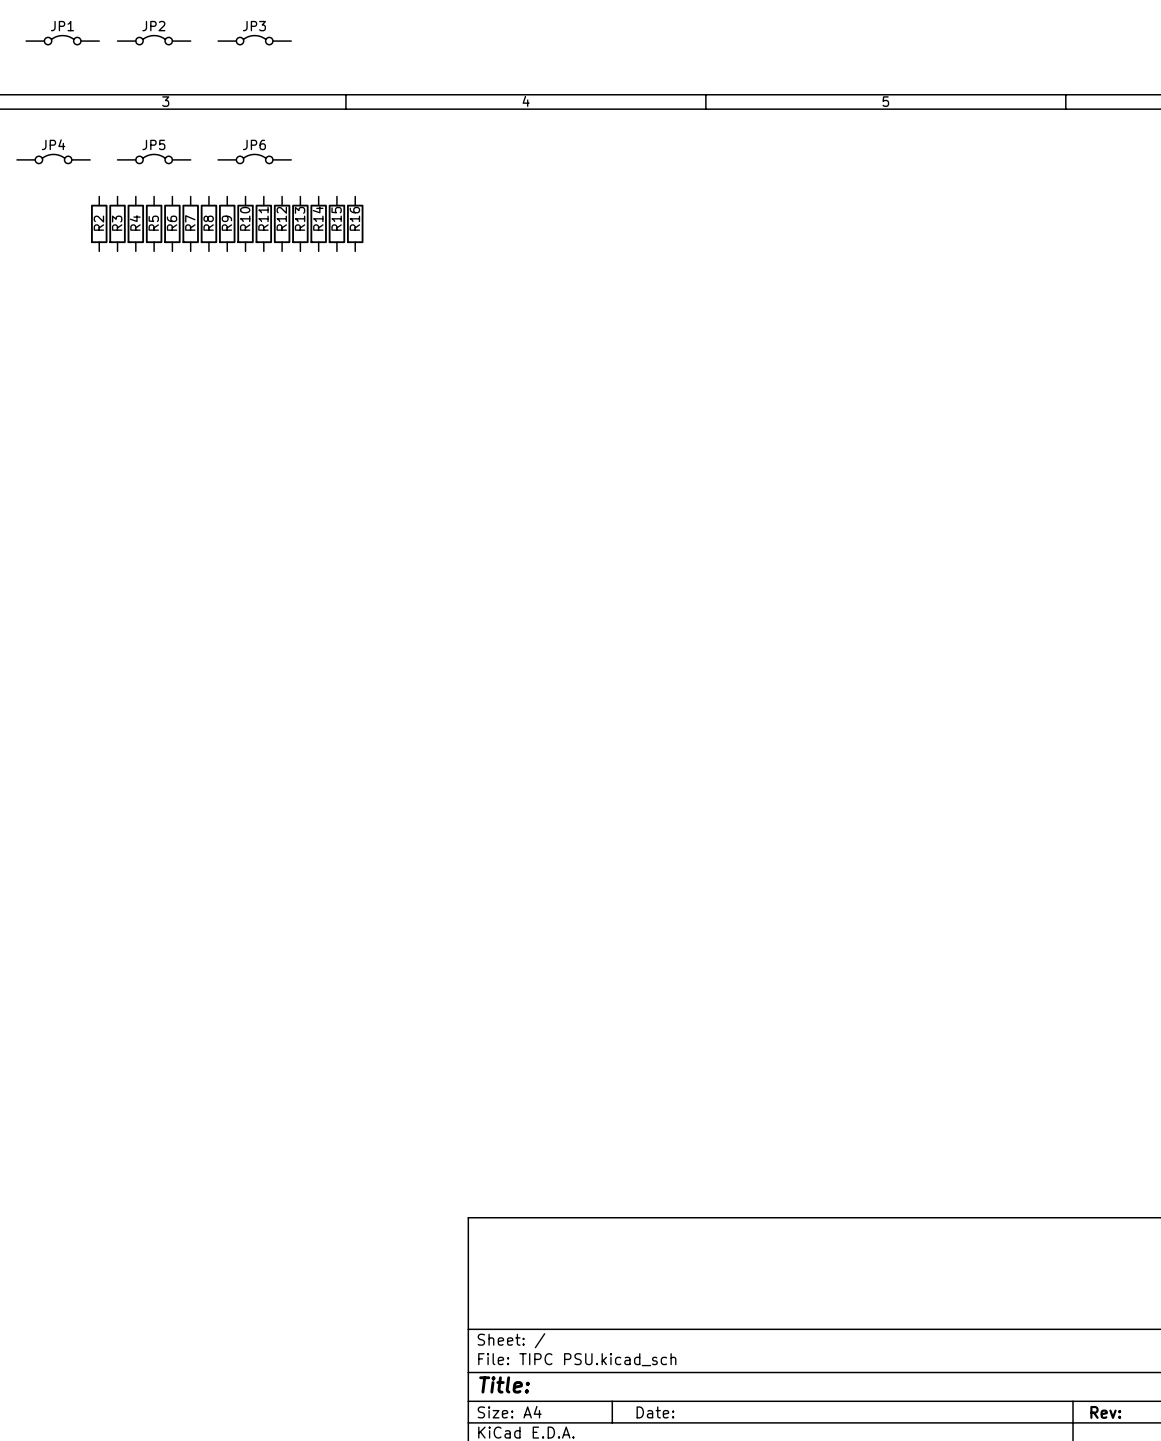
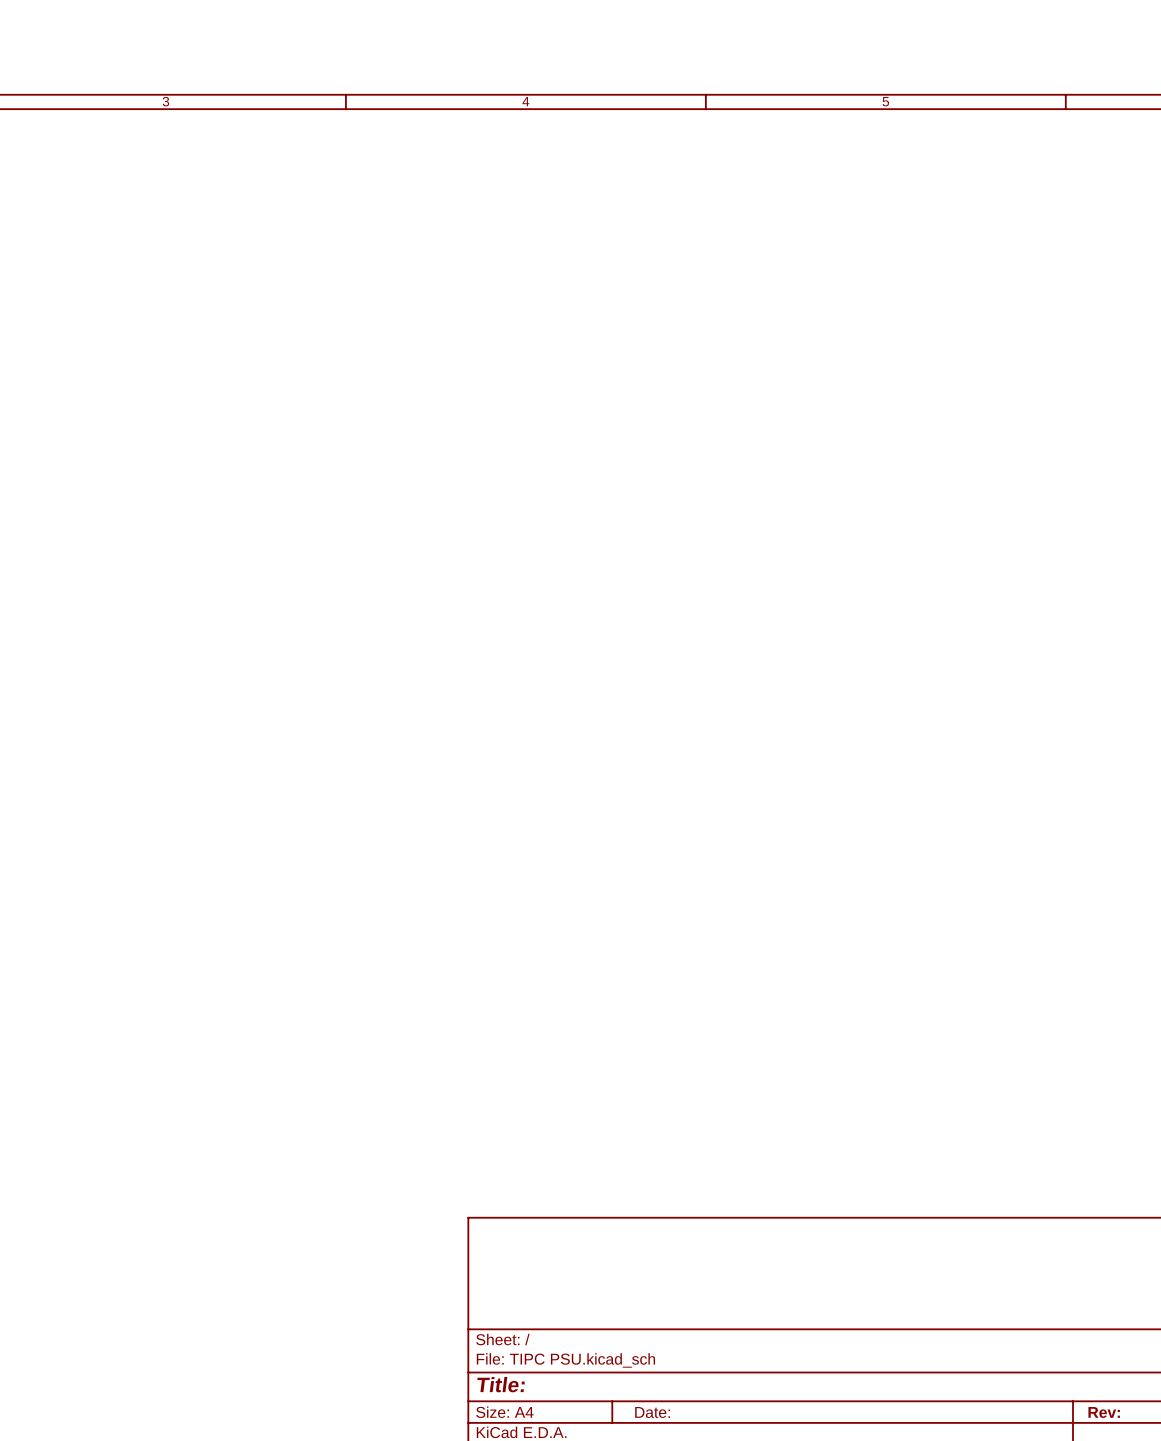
JP1: (62, 40) -> none
JP2: (154, 40) -> none
JP3: (254, 40) -> none
JP4: (53, 158) -> none
JP5: (154, 158) -> none
JP6: (254, 158) -> none
R2: (99, 223) -> none
R3: (117, 223) -> none
R4: (135, 223) -> none
R5: (154, 223) -> none
R6: (172, 223) -> none
R7: (190, 223) -> none
R8: (208, 223) -> none
R9: (227, 223) -> none
R10: (245, 223) -> none
R11: (263, 223) -> none
R12: (282, 223) -> none
R13: (300, 223) -> none
R14: (318, 223) -> none
R15: (336, 223) -> none
R16: (355, 223) -> none

